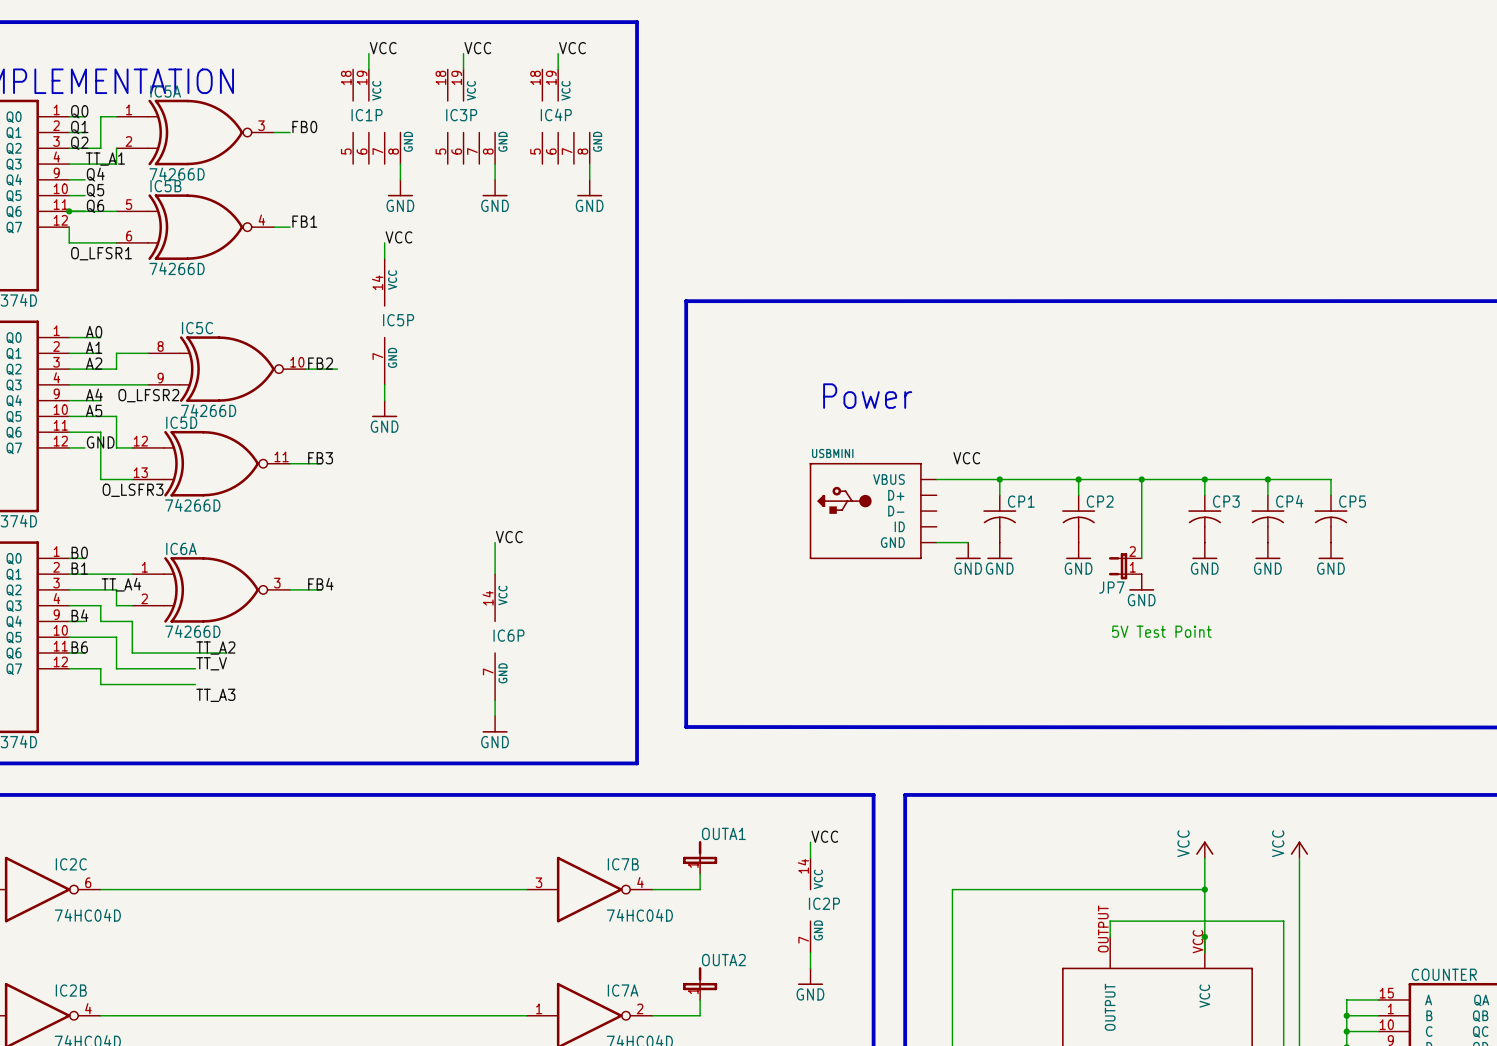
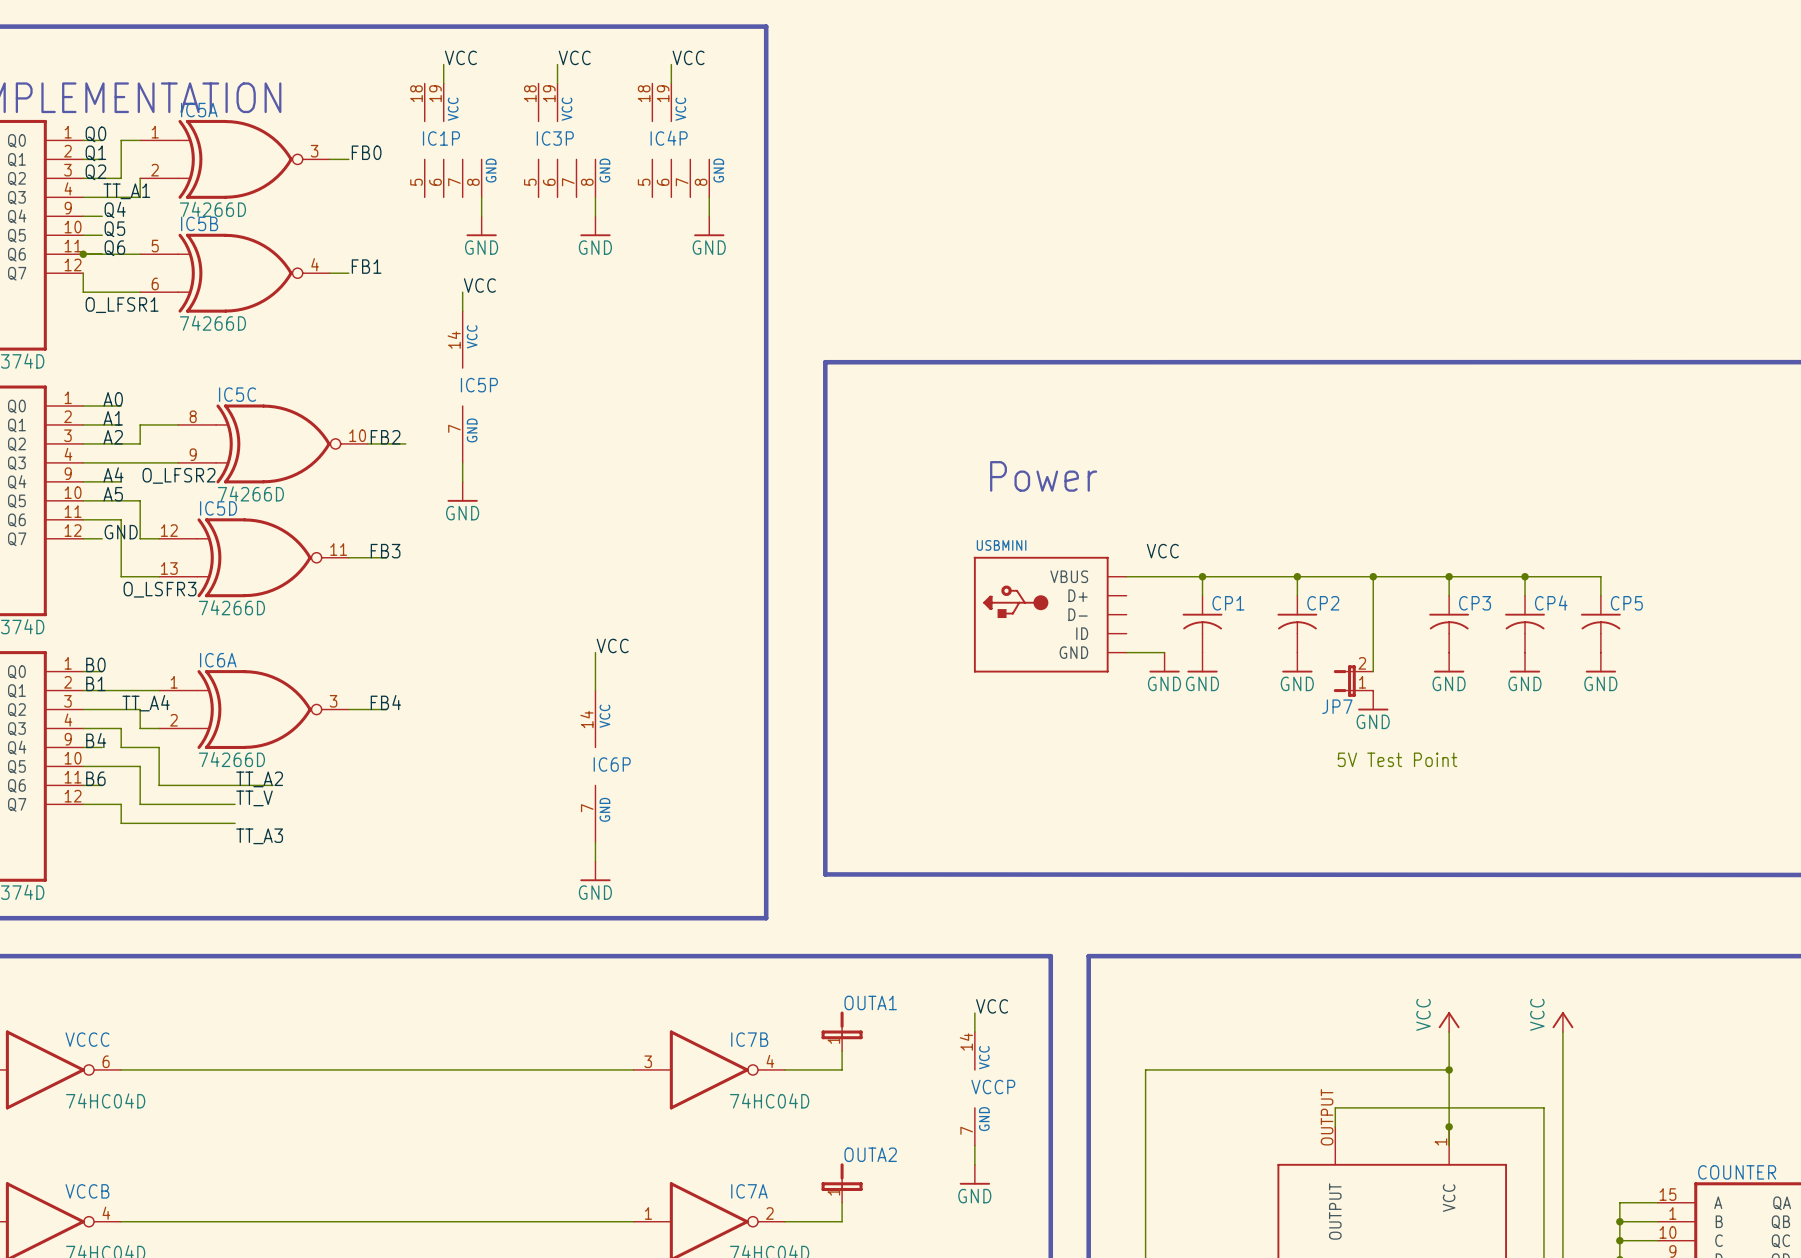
IC2C name: IC2C (71, 864) -> VCCC (87, 1039)
IC2P name: IC2P (824, 903) -> VCCP (993, 1087)
part pin number: VCC (1197, 941) -> 1 (1440, 1141)
IC2B name: IC2B (71, 990) -> VCCB (87, 1191)

